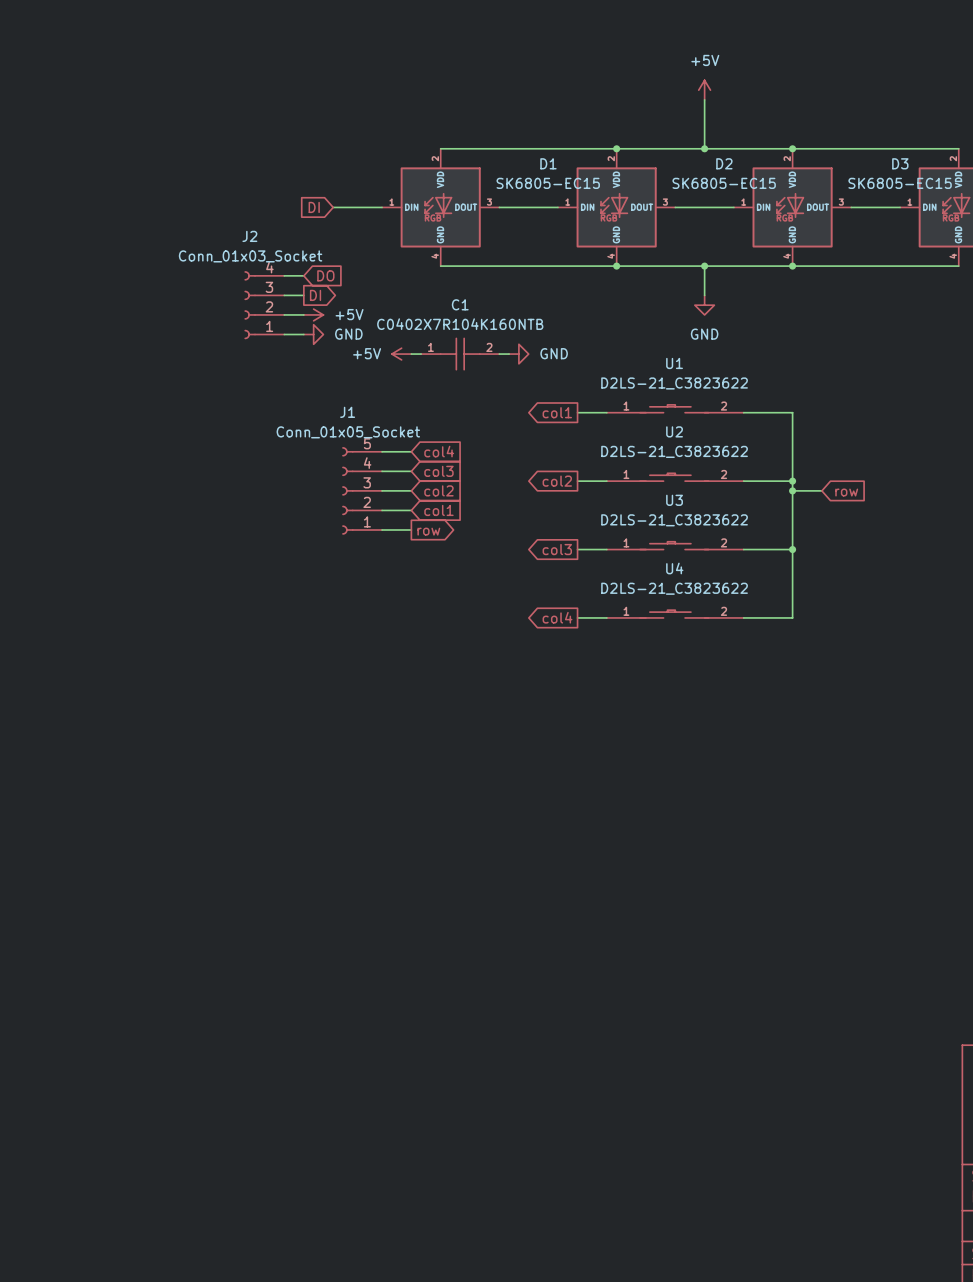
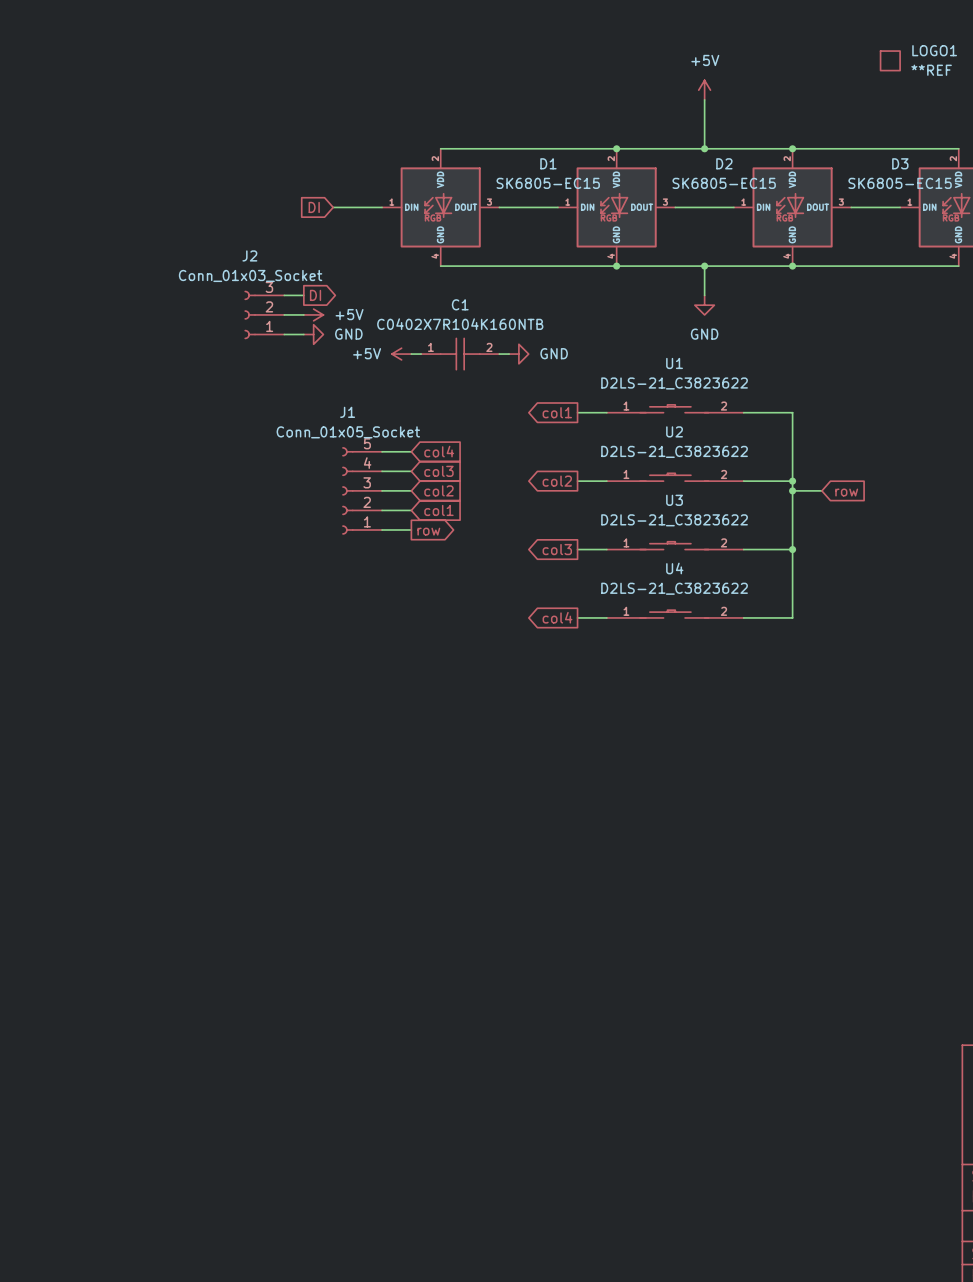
LOGO1: none -> **REF (890, 60)
J2 symbol: [244, 271, 285, 340] -> [244, 290, 285, 340]
wire: (284, 275) (303, 275) -> none
global label: DO (325, 275) -> none

